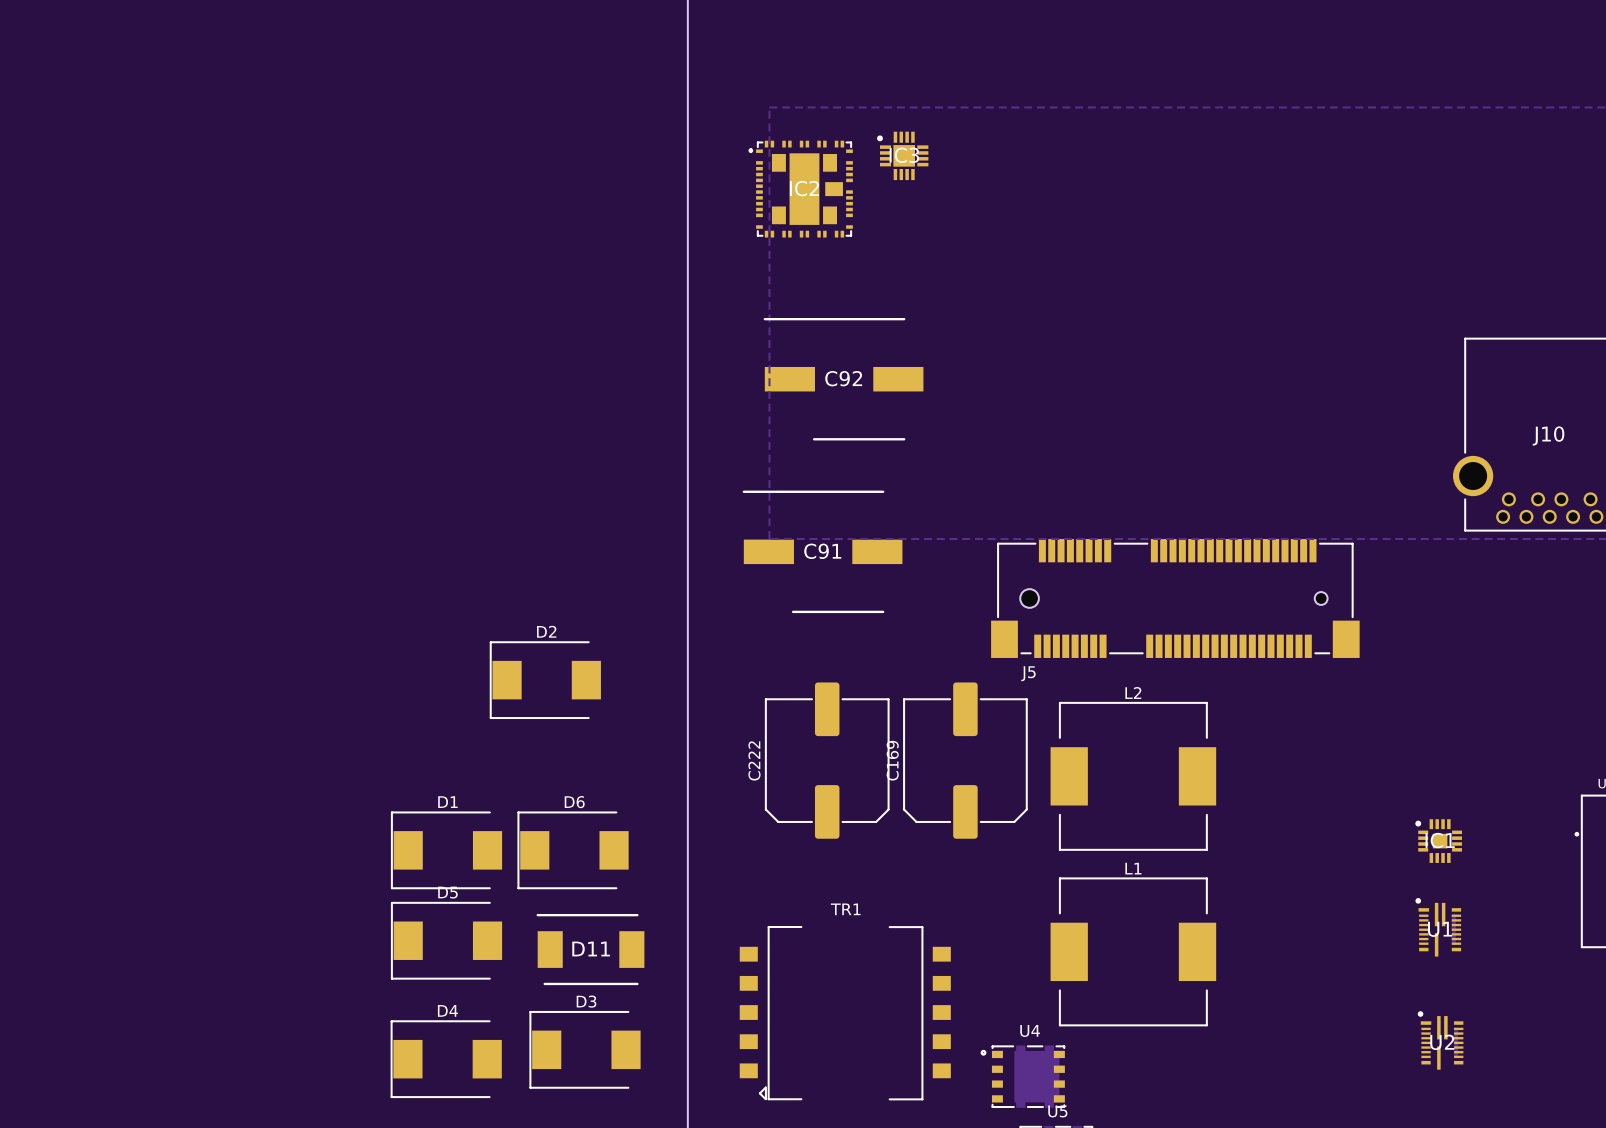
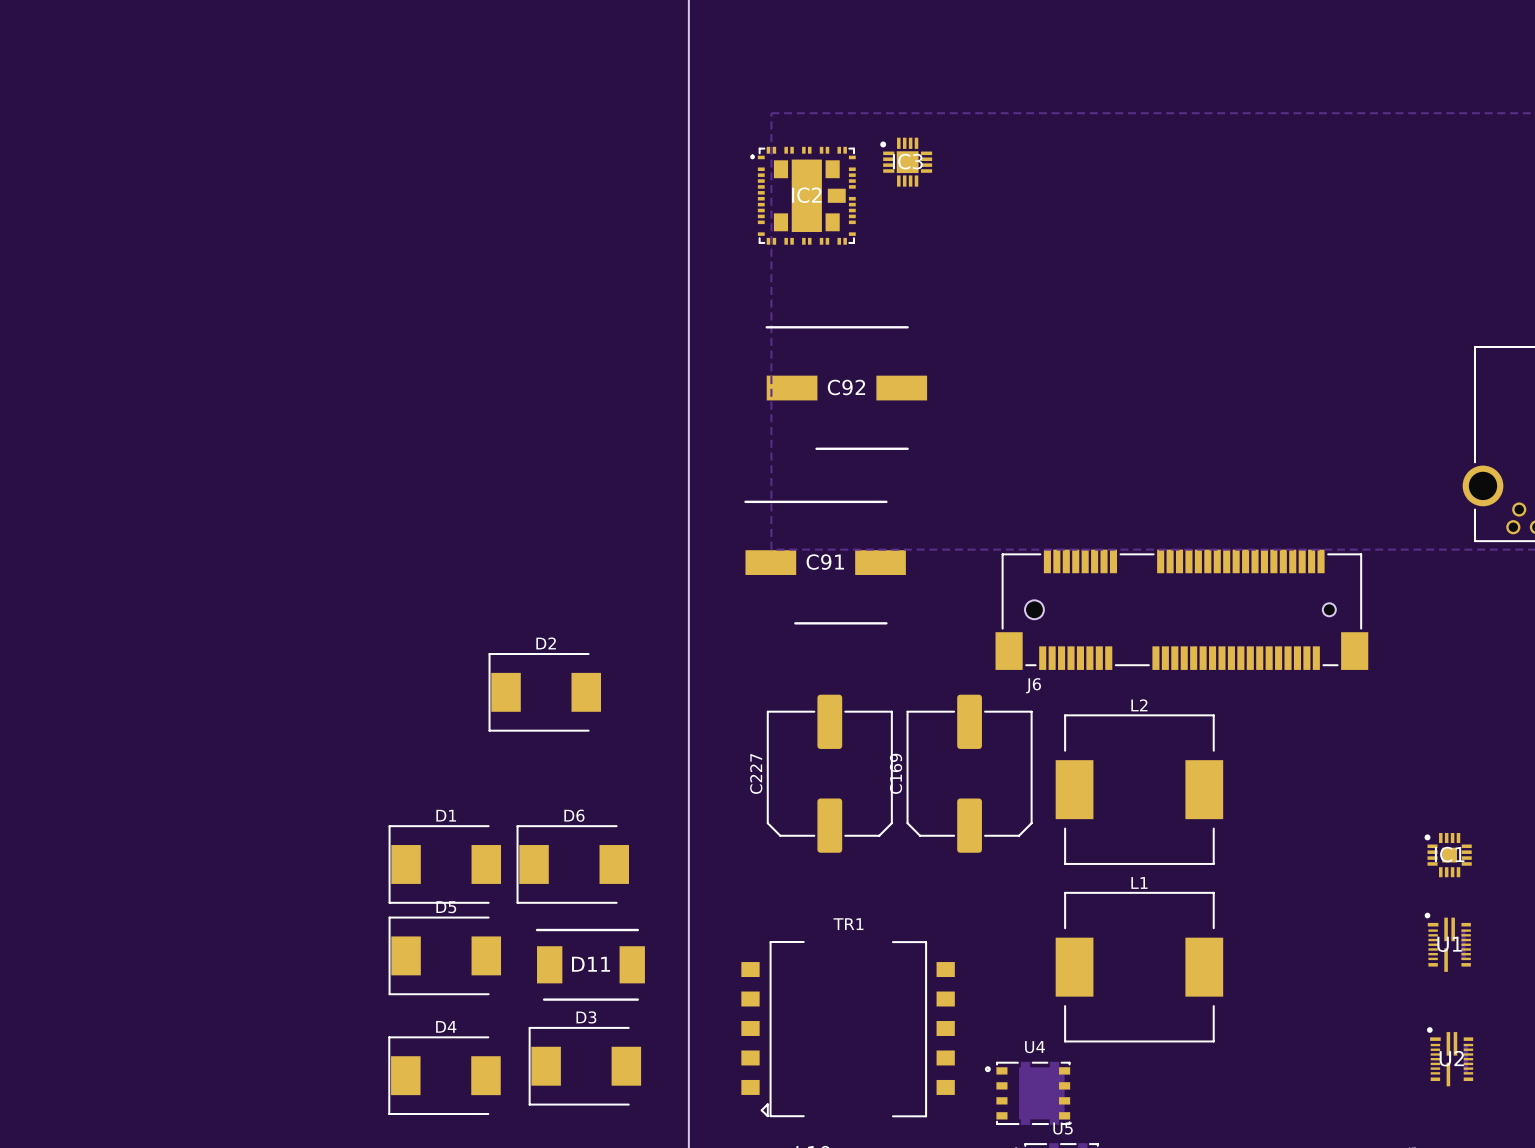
J5 name: J5 (1028, 673) -> J6 (1033, 685)
C222 name: C222 (754, 760) -> C227 (756, 773)

